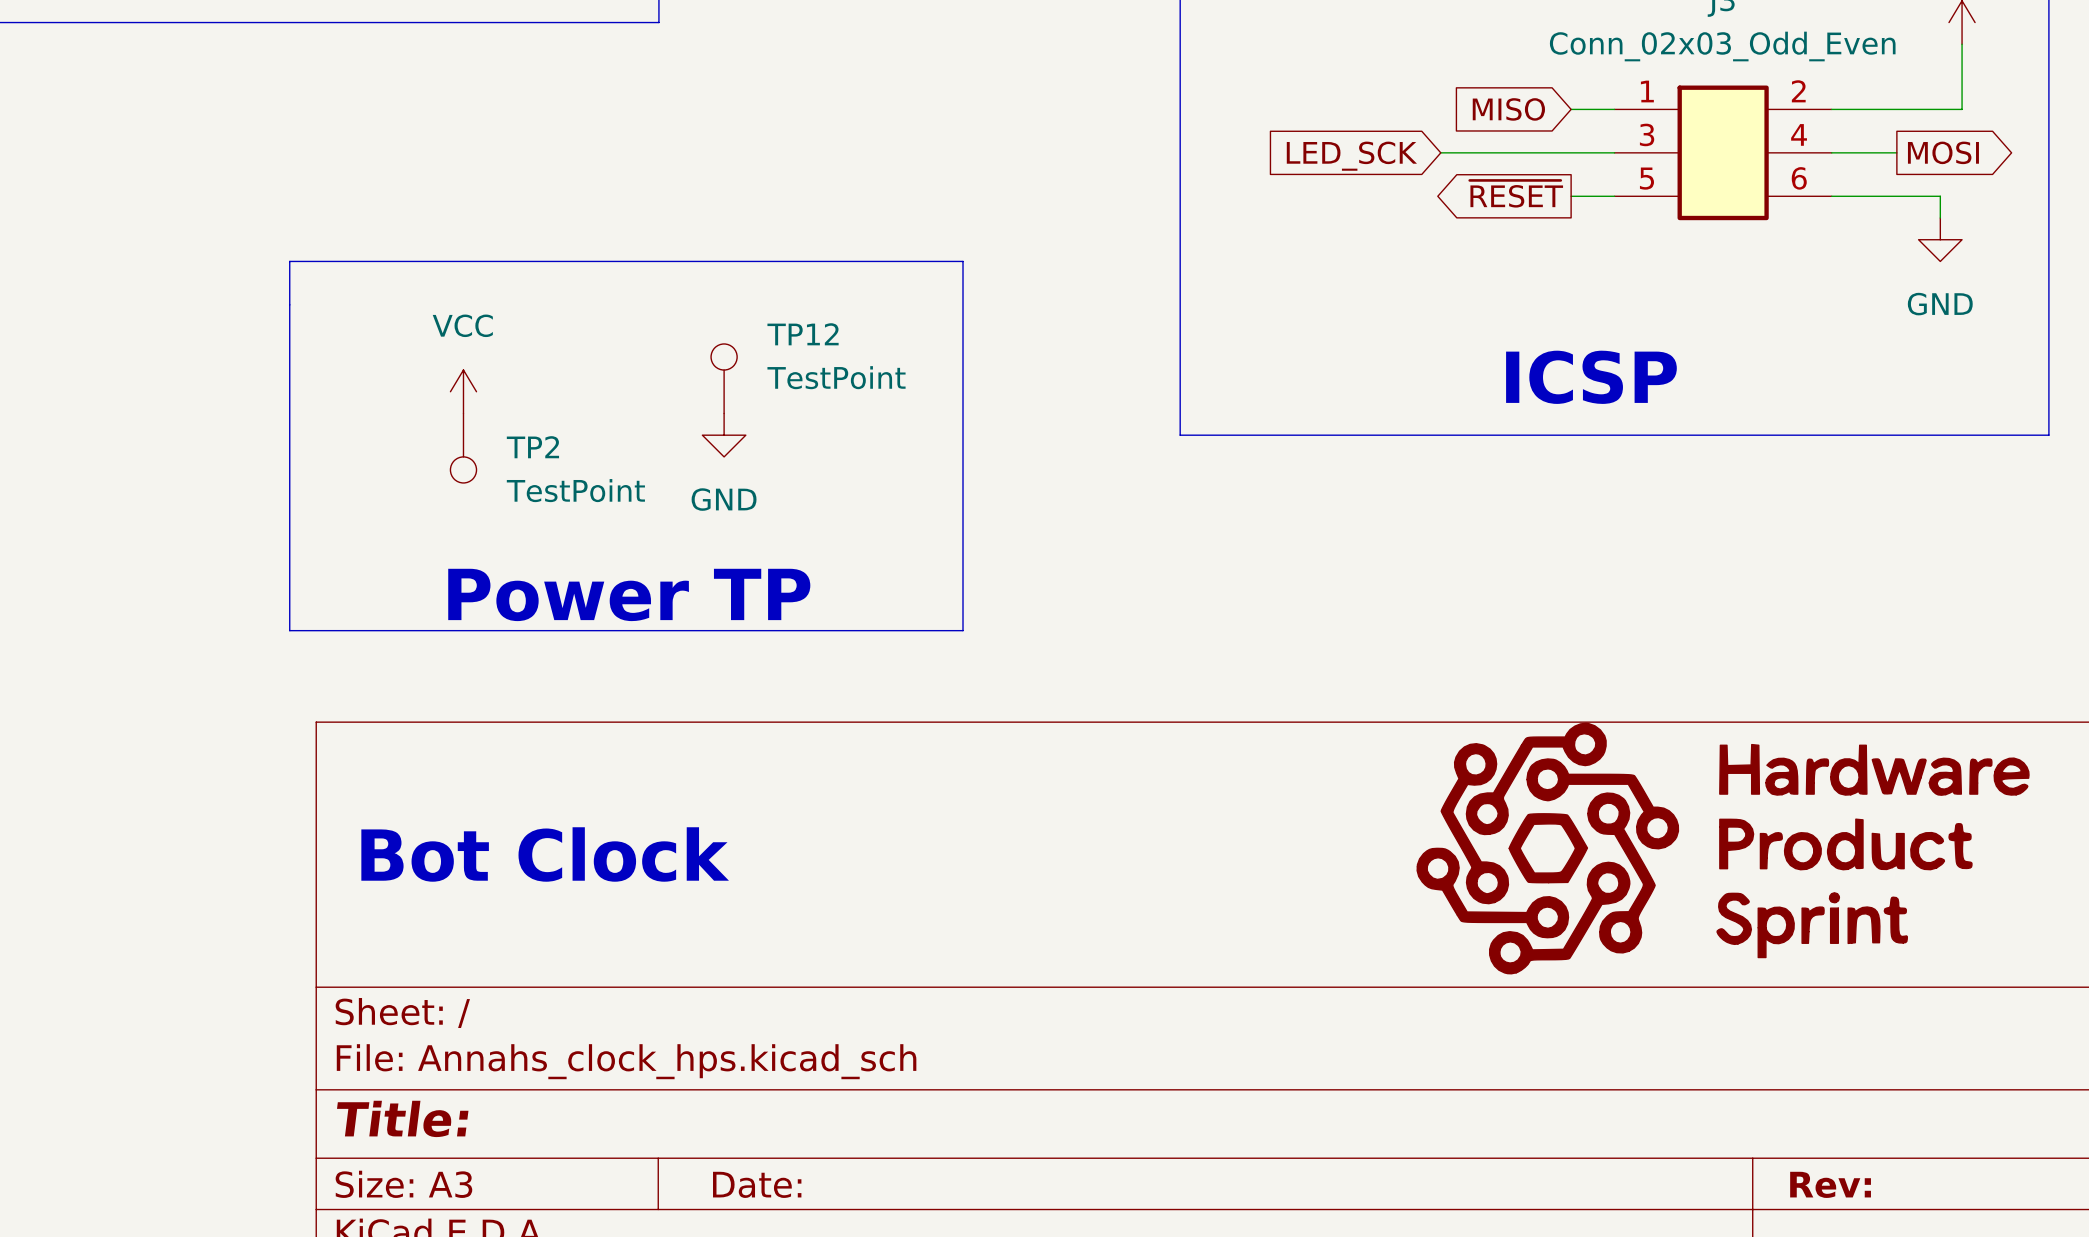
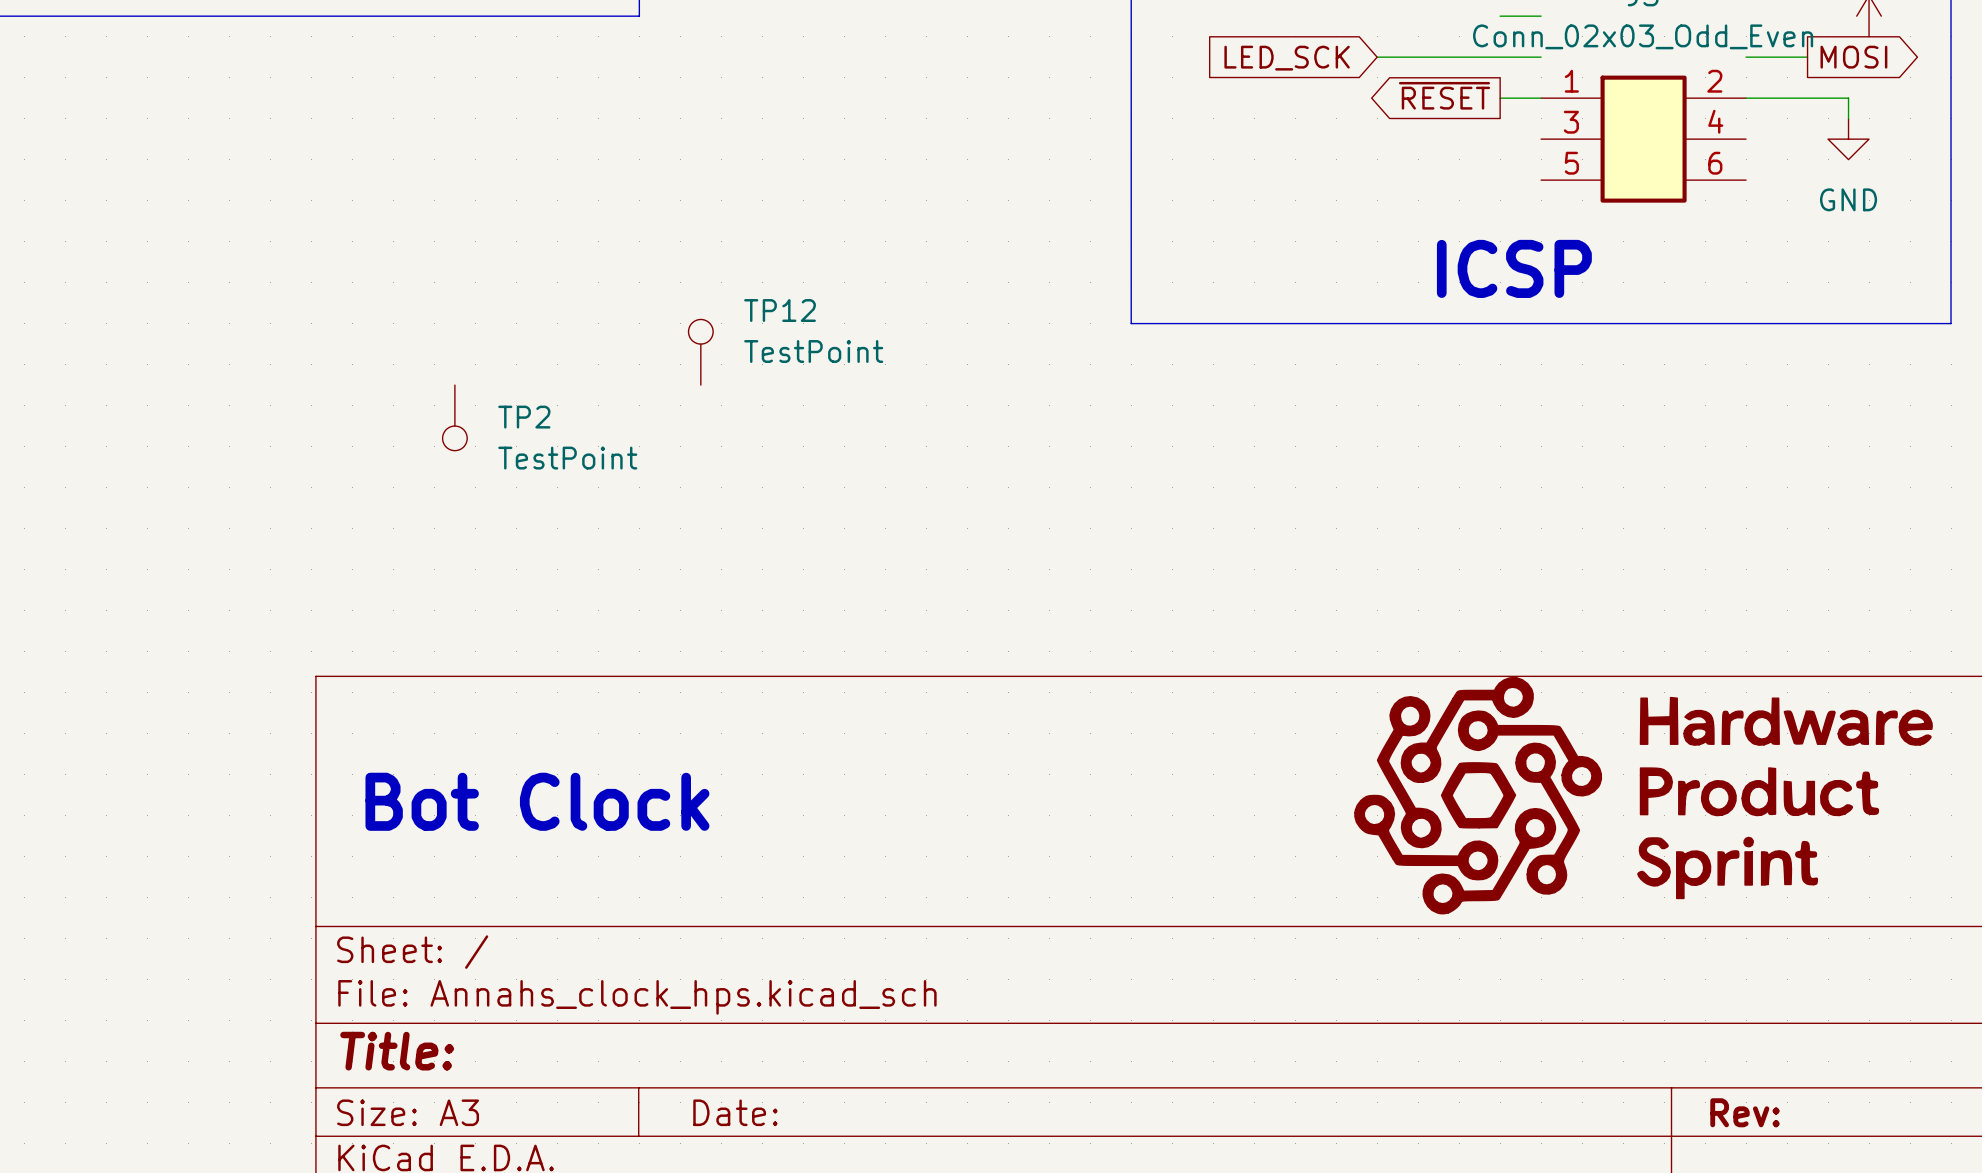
wire: (1962, 44) (1962, 109) (1940, 109) -> (1848, 118) (1848, 98)
global label shape: input (1508, 109) -> output (1444, 95)
global label: MISO (1508, 109) -> ~{RESET} (1444, 95)
wire: (1440, 152) (1614, 152) -> (1377, 57) (1541, 57)
wire: (1831, 152) (1896, 152) -> (1746, 57) (1807, 57)
global label position: MOSI (1943, 152) -> MOSI (1853, 57)
global label position: LED_SCK (1351, 156) -> LED_SCK (1287, 58)
global label: ~{RESET} (1516, 194) -> none
wire: (1571, 196) (1614, 196) -> (1500, 16) (1541, 16)
wire: (1831, 196) (1940, 196) (1940, 218) -> none
power symbol position: GND (1940, 239) -> GND (1848, 139)
line: (289, 261) (289, 630) (963, 630) (963, 261) (289, 261) -> none
line: (1180, 348) (1180, 435) (2048, 435) (2048, 348) -> (1131, 323) (1951, 323)
text position: ICSP (1591, 377) -> ICSP (1514, 268)
power symbol: VCC (463, 391) -> none
power symbol: GND (724, 435) -> none
text: Power TP (629, 594) -> none

